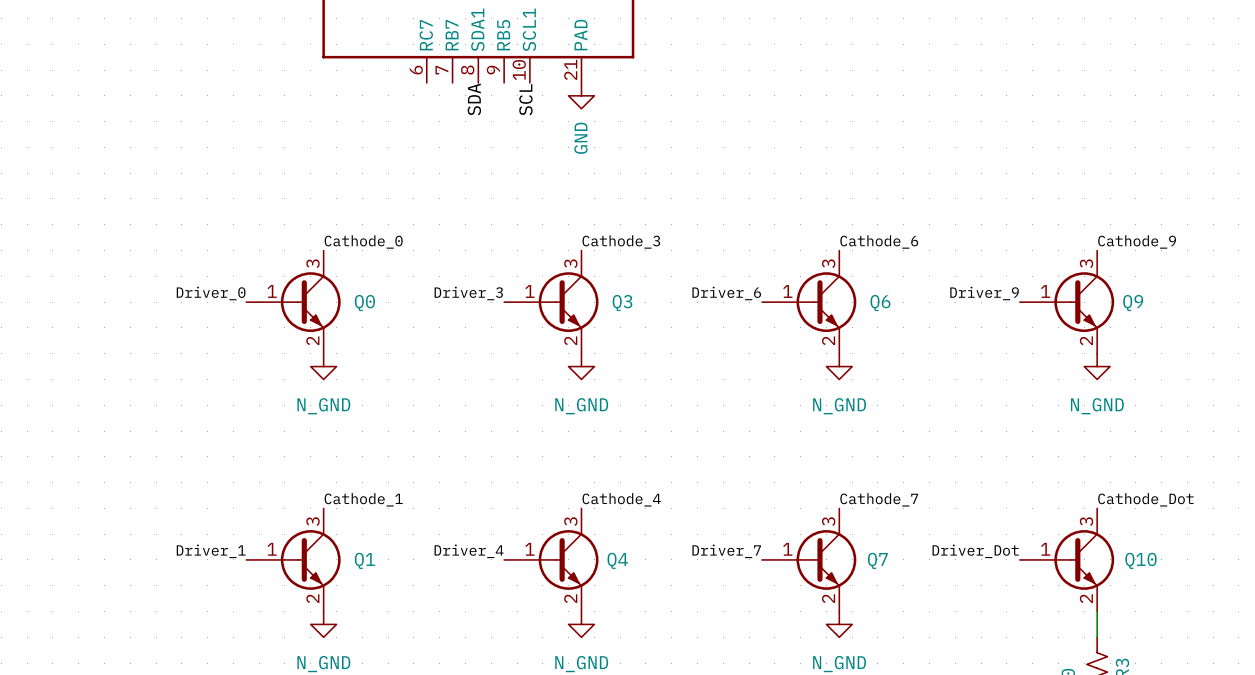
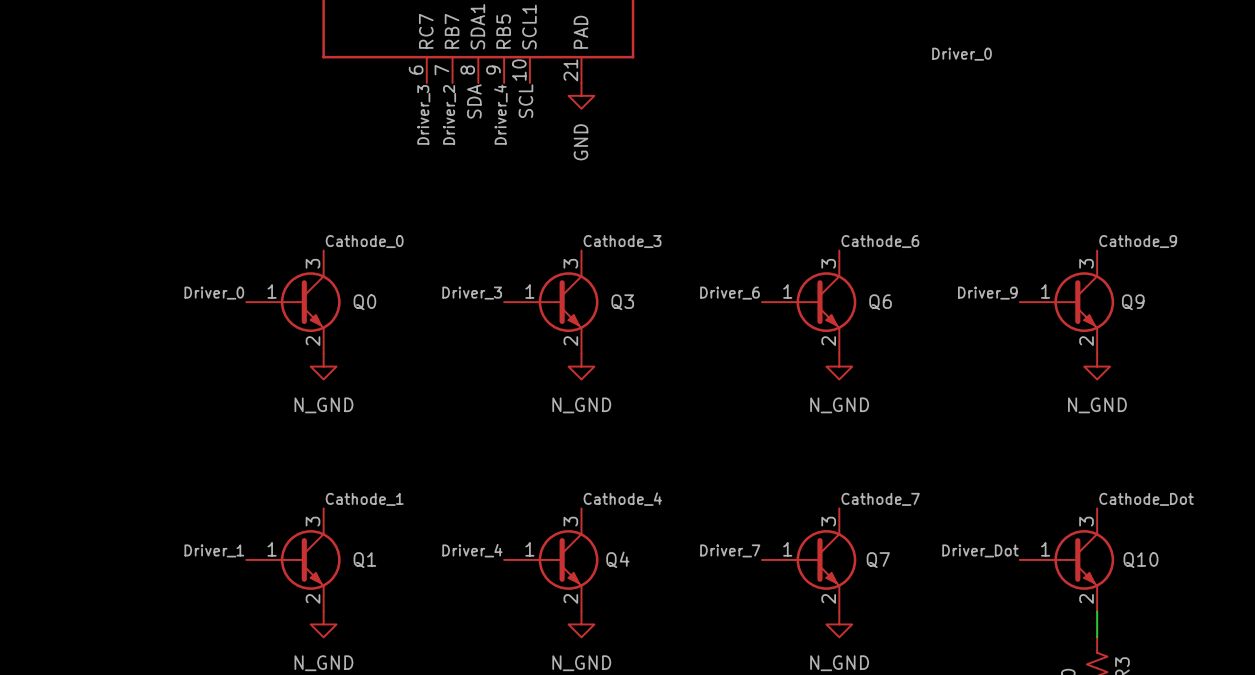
label: none -> Driver_0 (962, 54)
label: none -> Driver_3 (423, 114)
label: none -> Driver_2 (449, 114)
label: none -> Driver_4 (500, 114)

